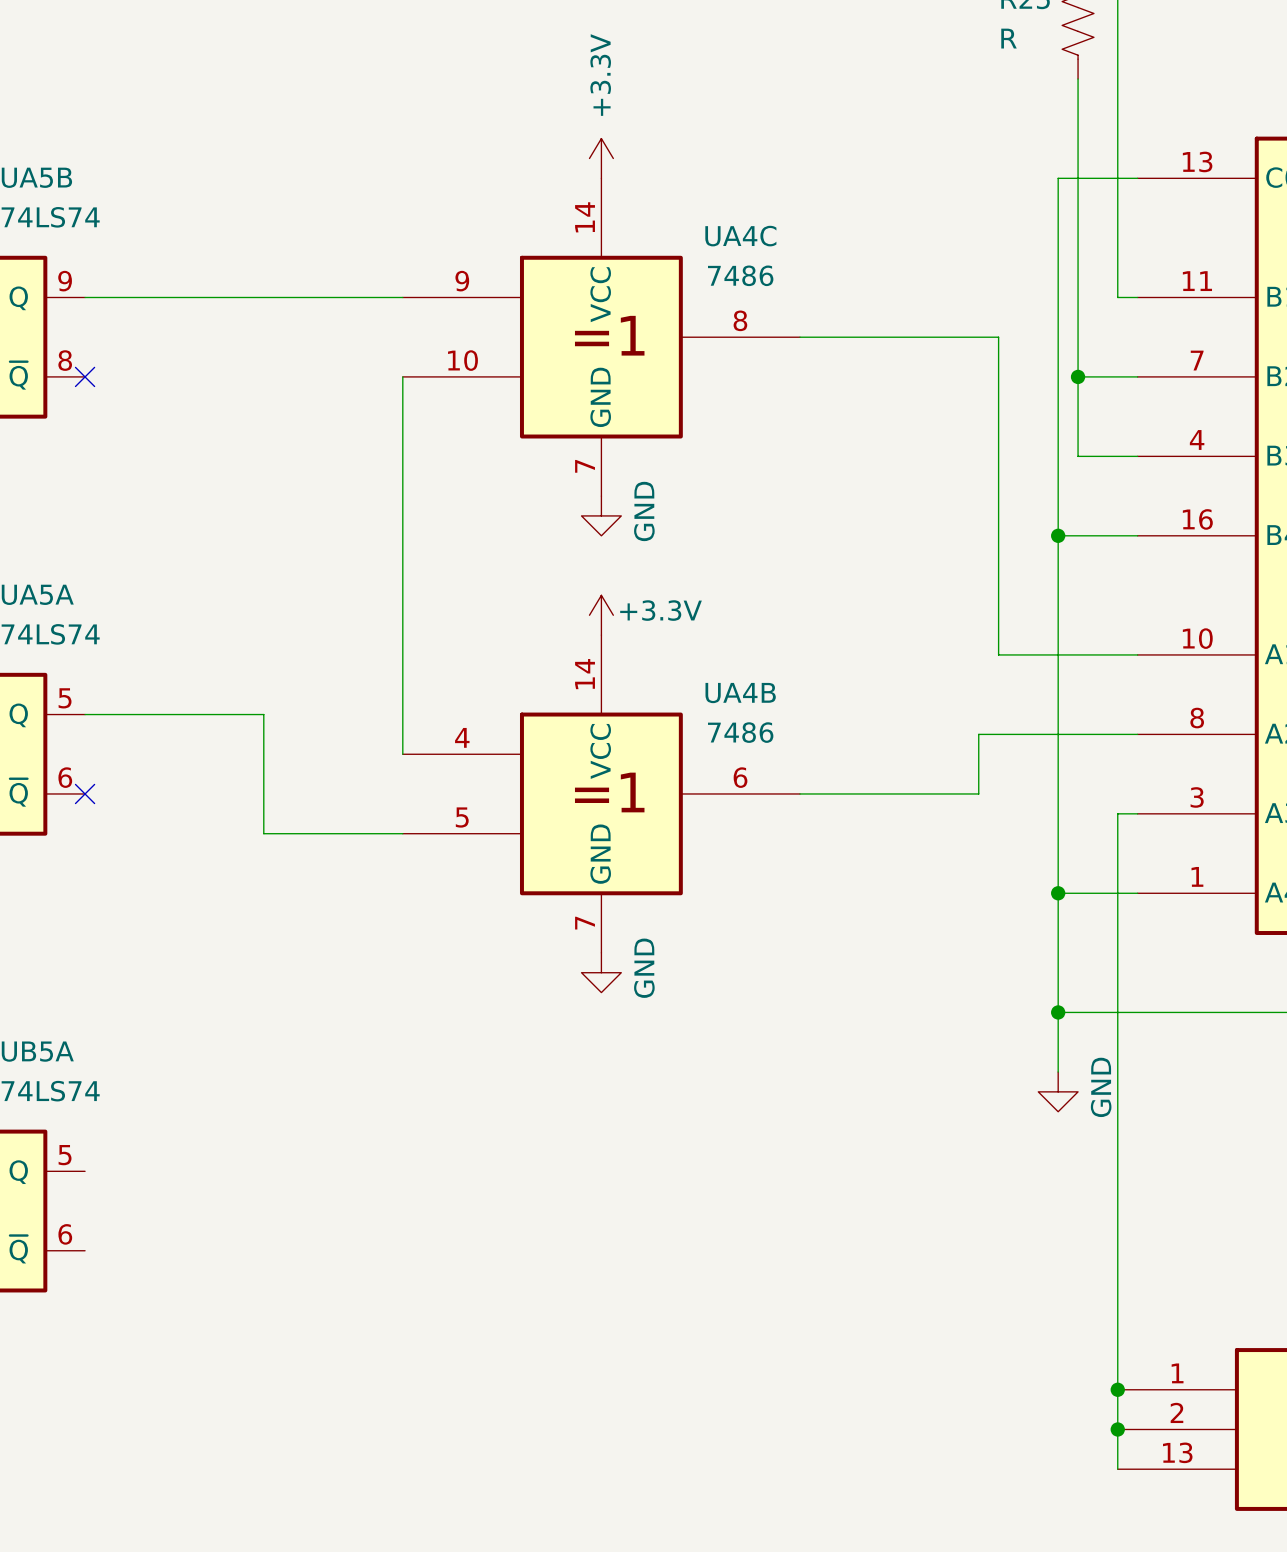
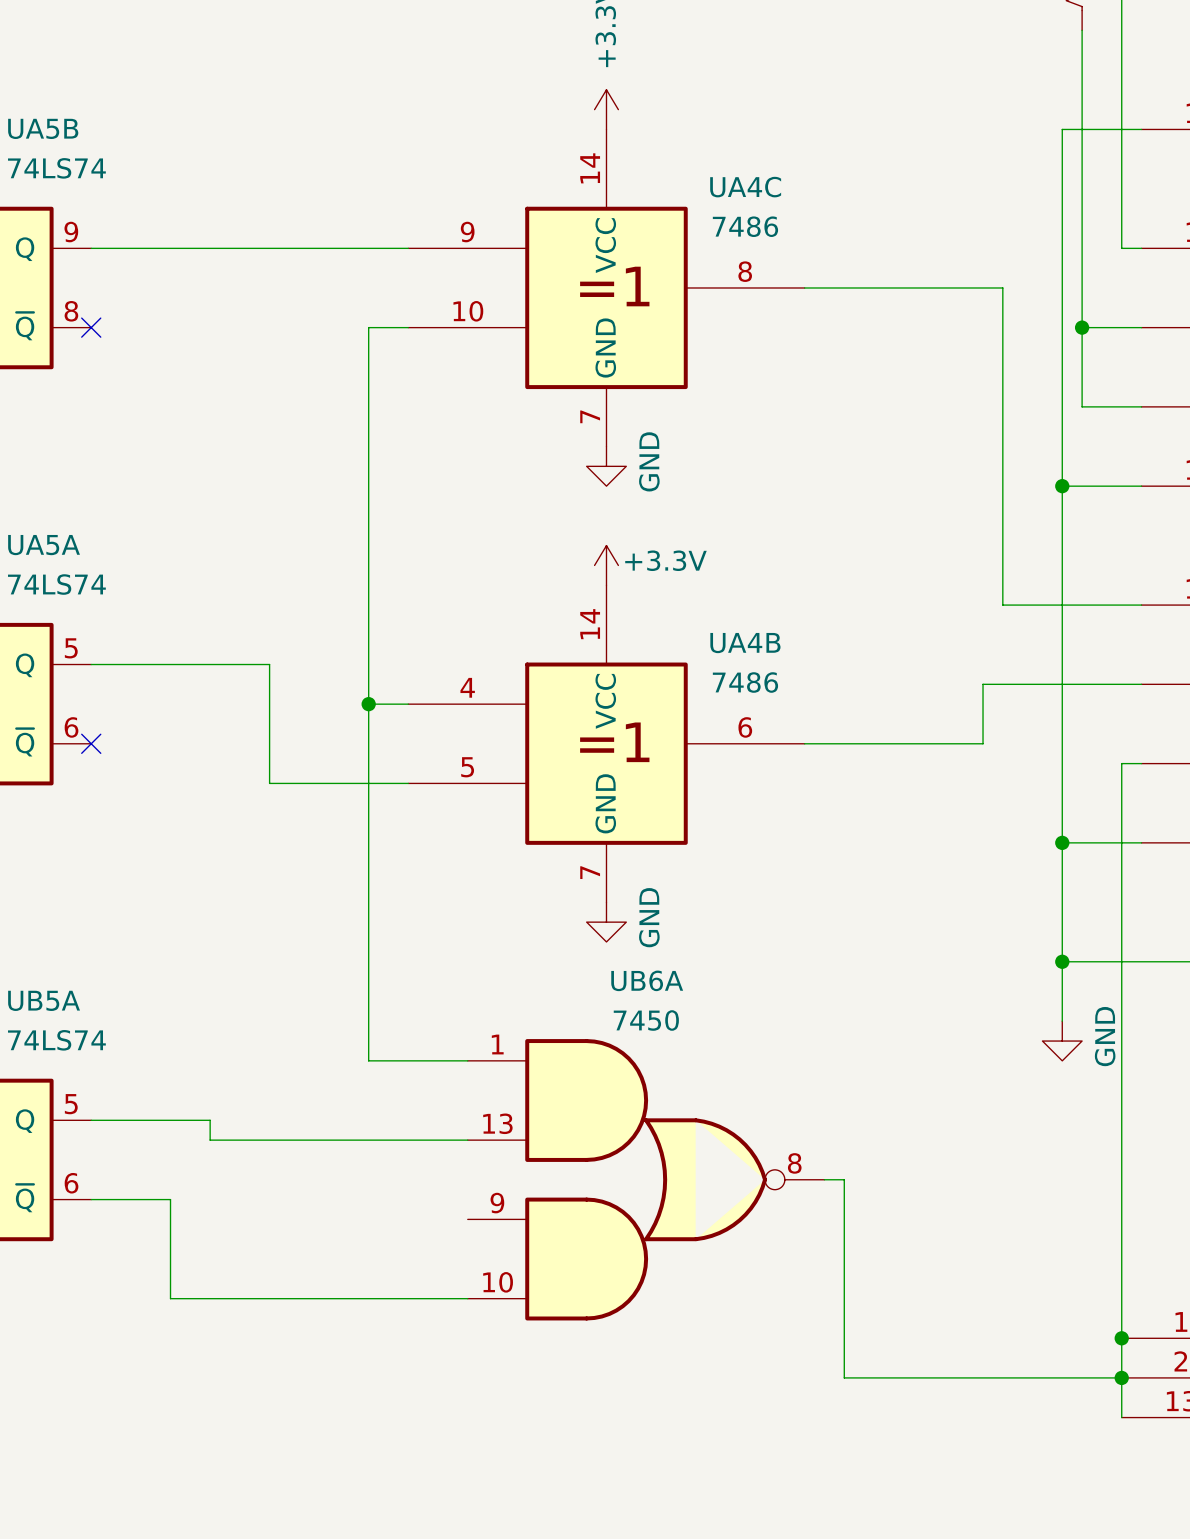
wire: (402, 376) (402, 754) -> (408, 327) (368, 327) (368, 1060) (467, 1060)
wire: none -> (368, 704) (408, 704)
junction: none -> (368, 704)
wire: none -> (91, 1120) (210, 1120) (210, 1140) (467, 1140)
UB6A: none -> 7450 (646, 1179)
wire: none -> (824, 1179) (844, 1179) (844, 1377) (1121, 1377)
wire: none -> (91, 1199) (170, 1199) (170, 1298) (467, 1298)

